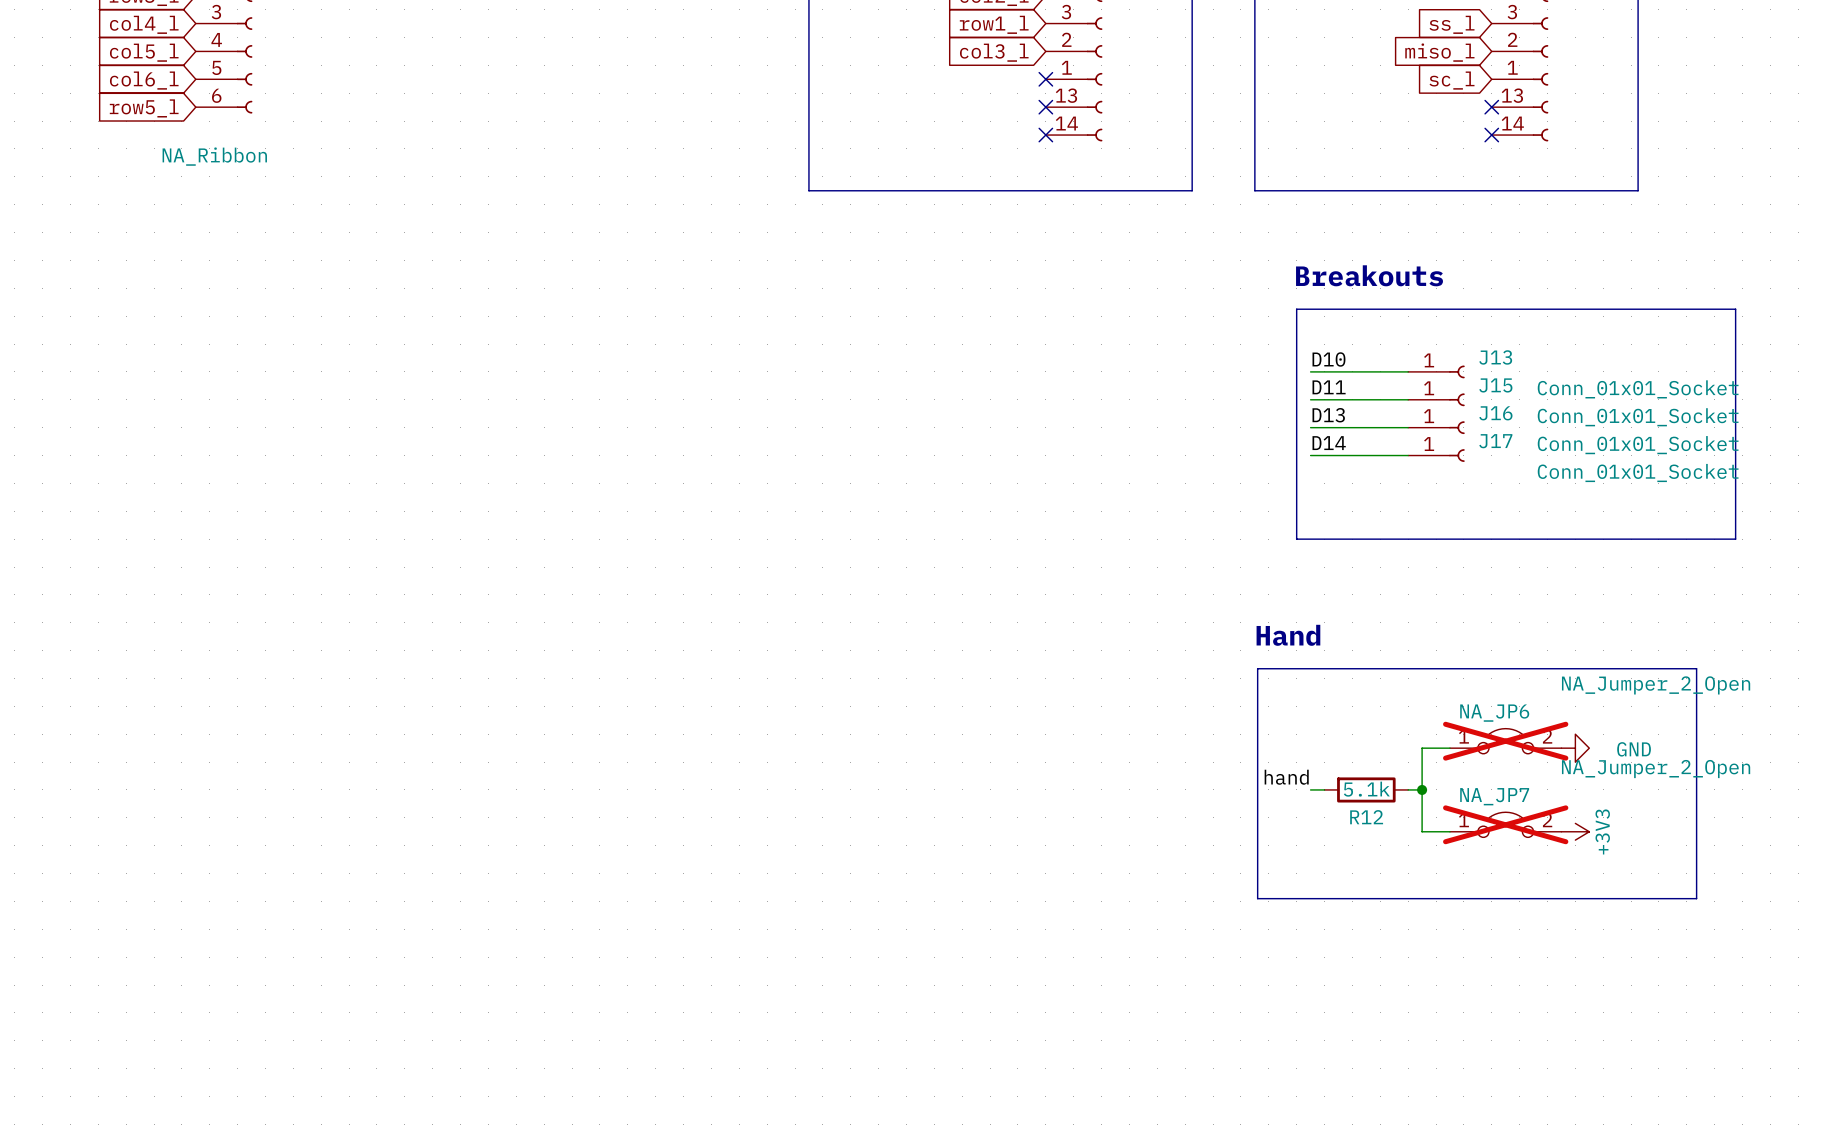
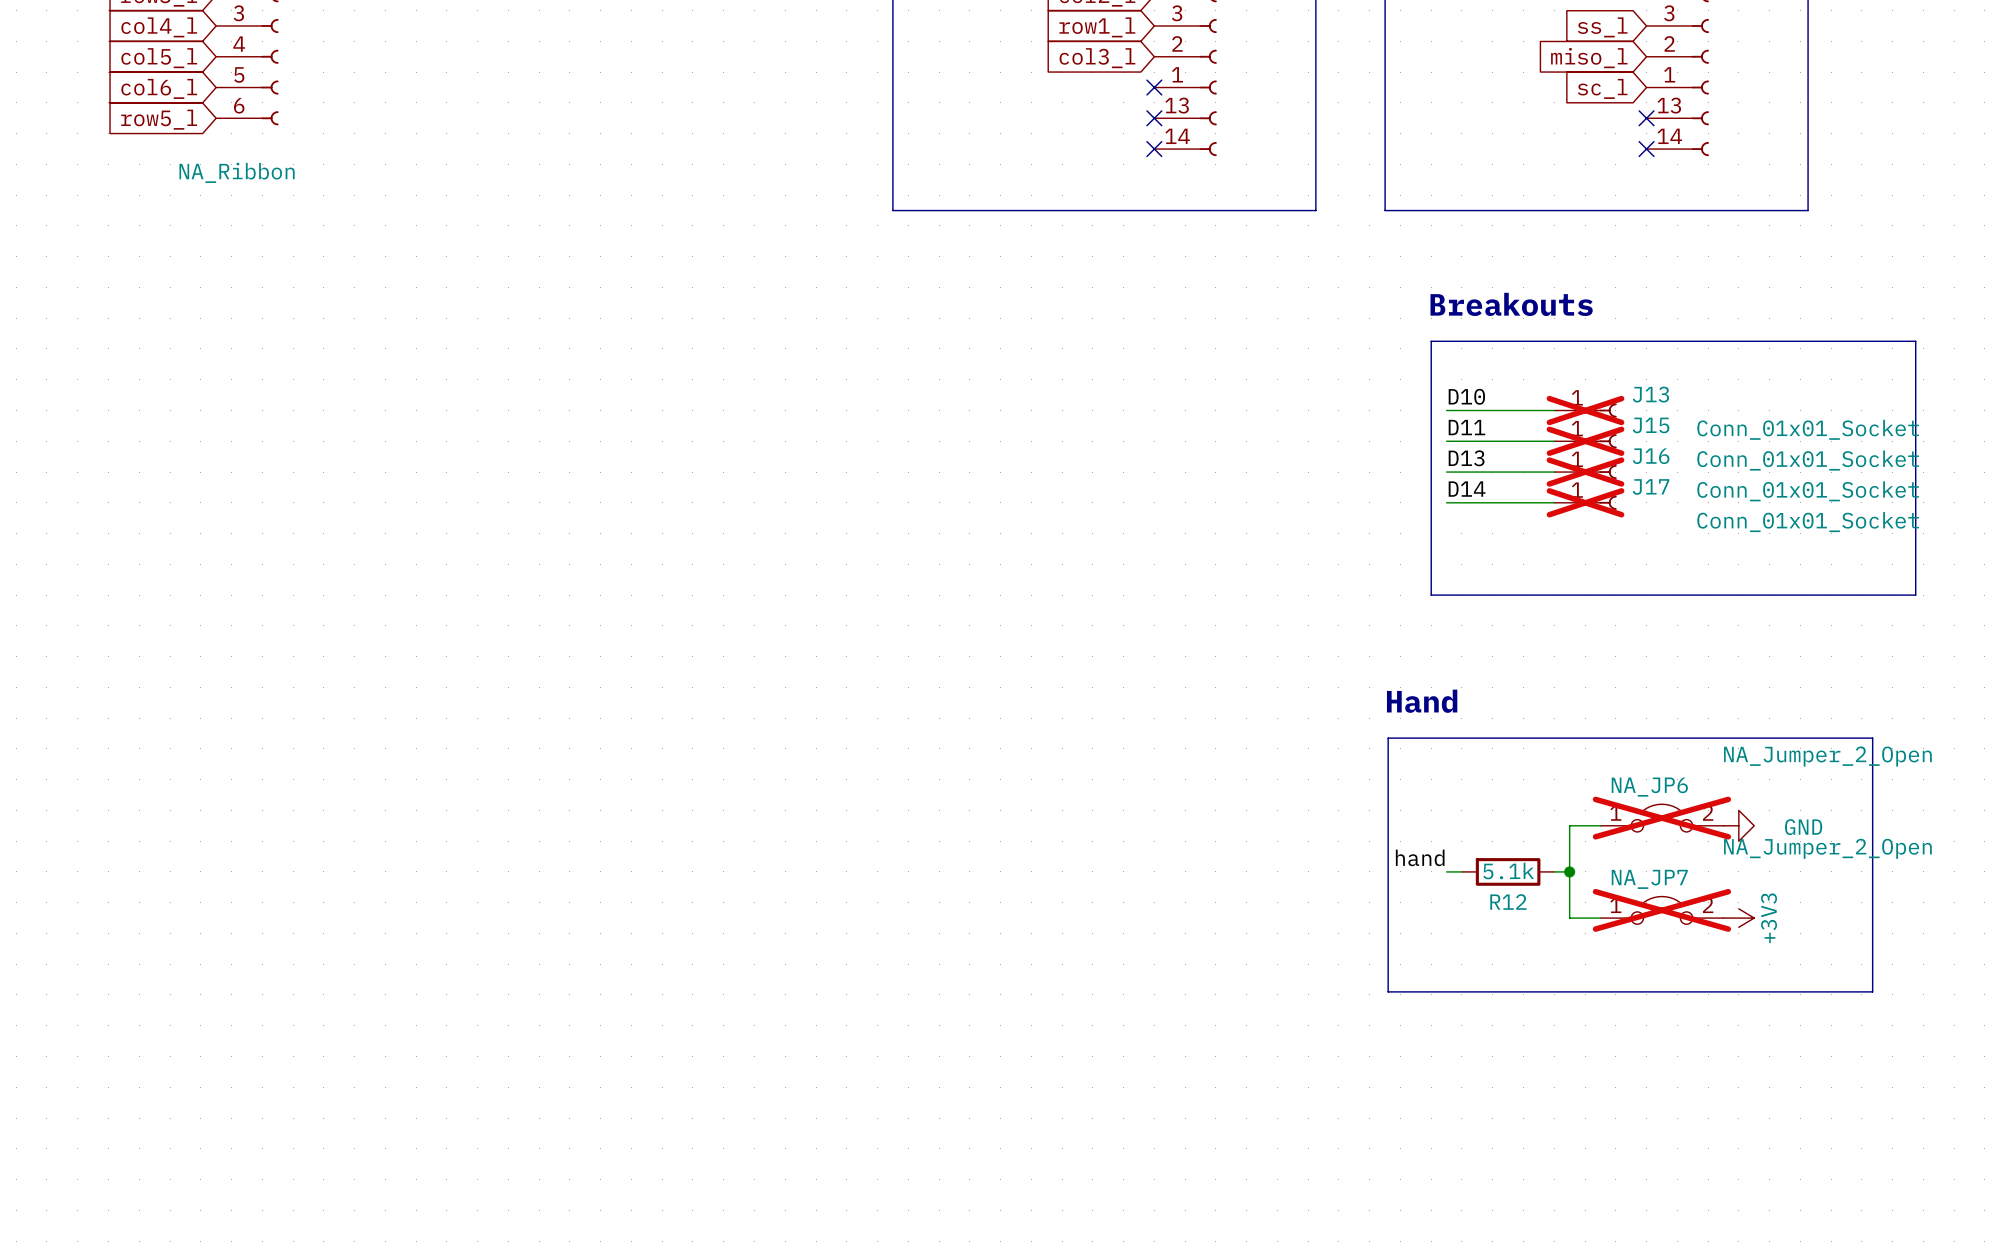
J13 do-not-place cross: none -> (1585, 410)
J15 do-not-place cross: none -> (1585, 441)
J16 do-not-place cross: none -> (1585, 472)
J17 do-not-place cross: none -> (1585, 502)

